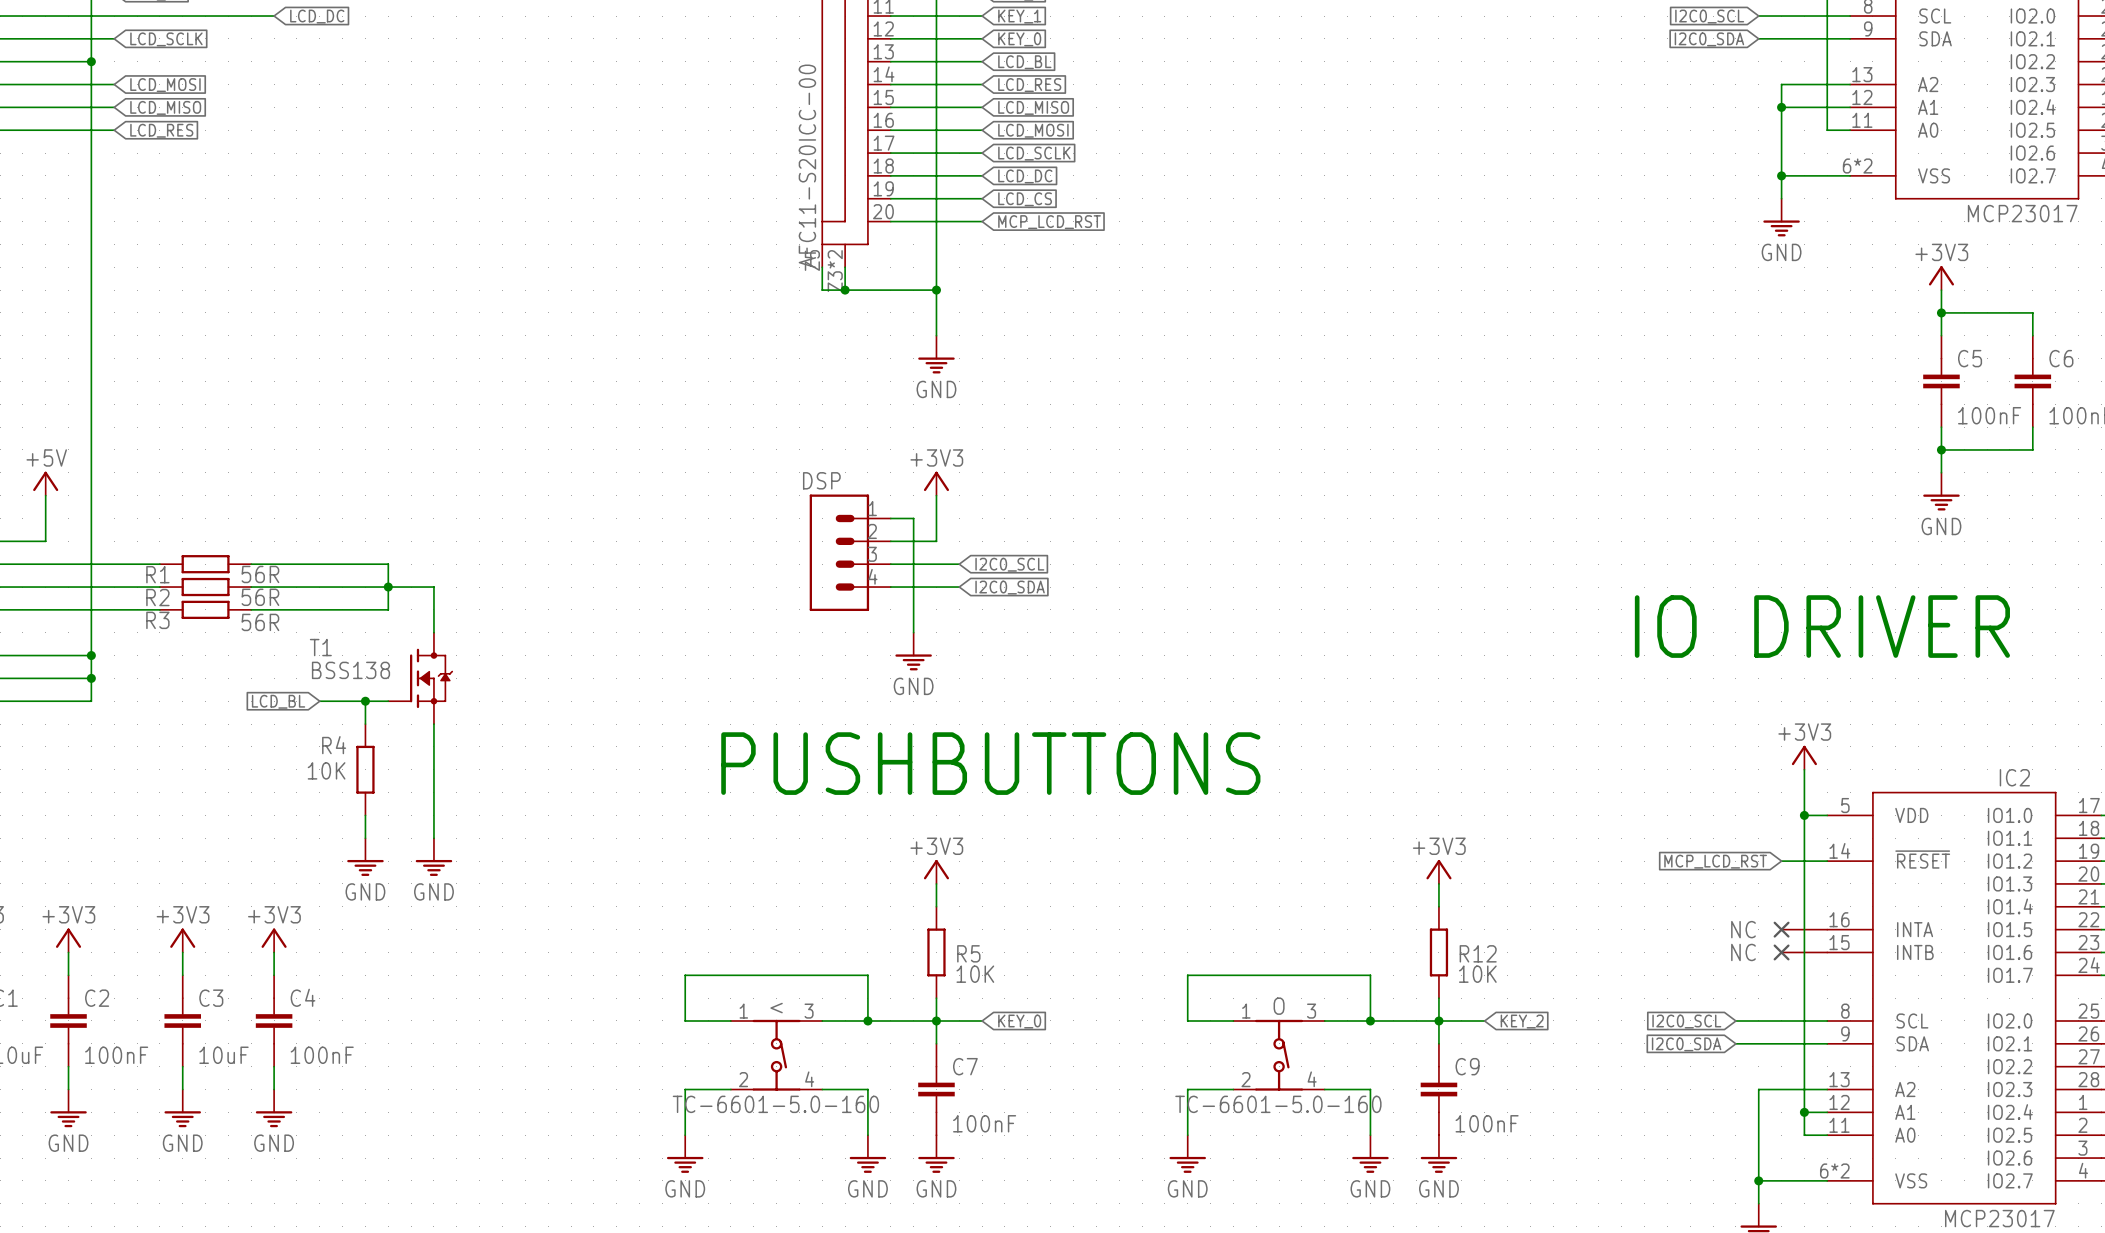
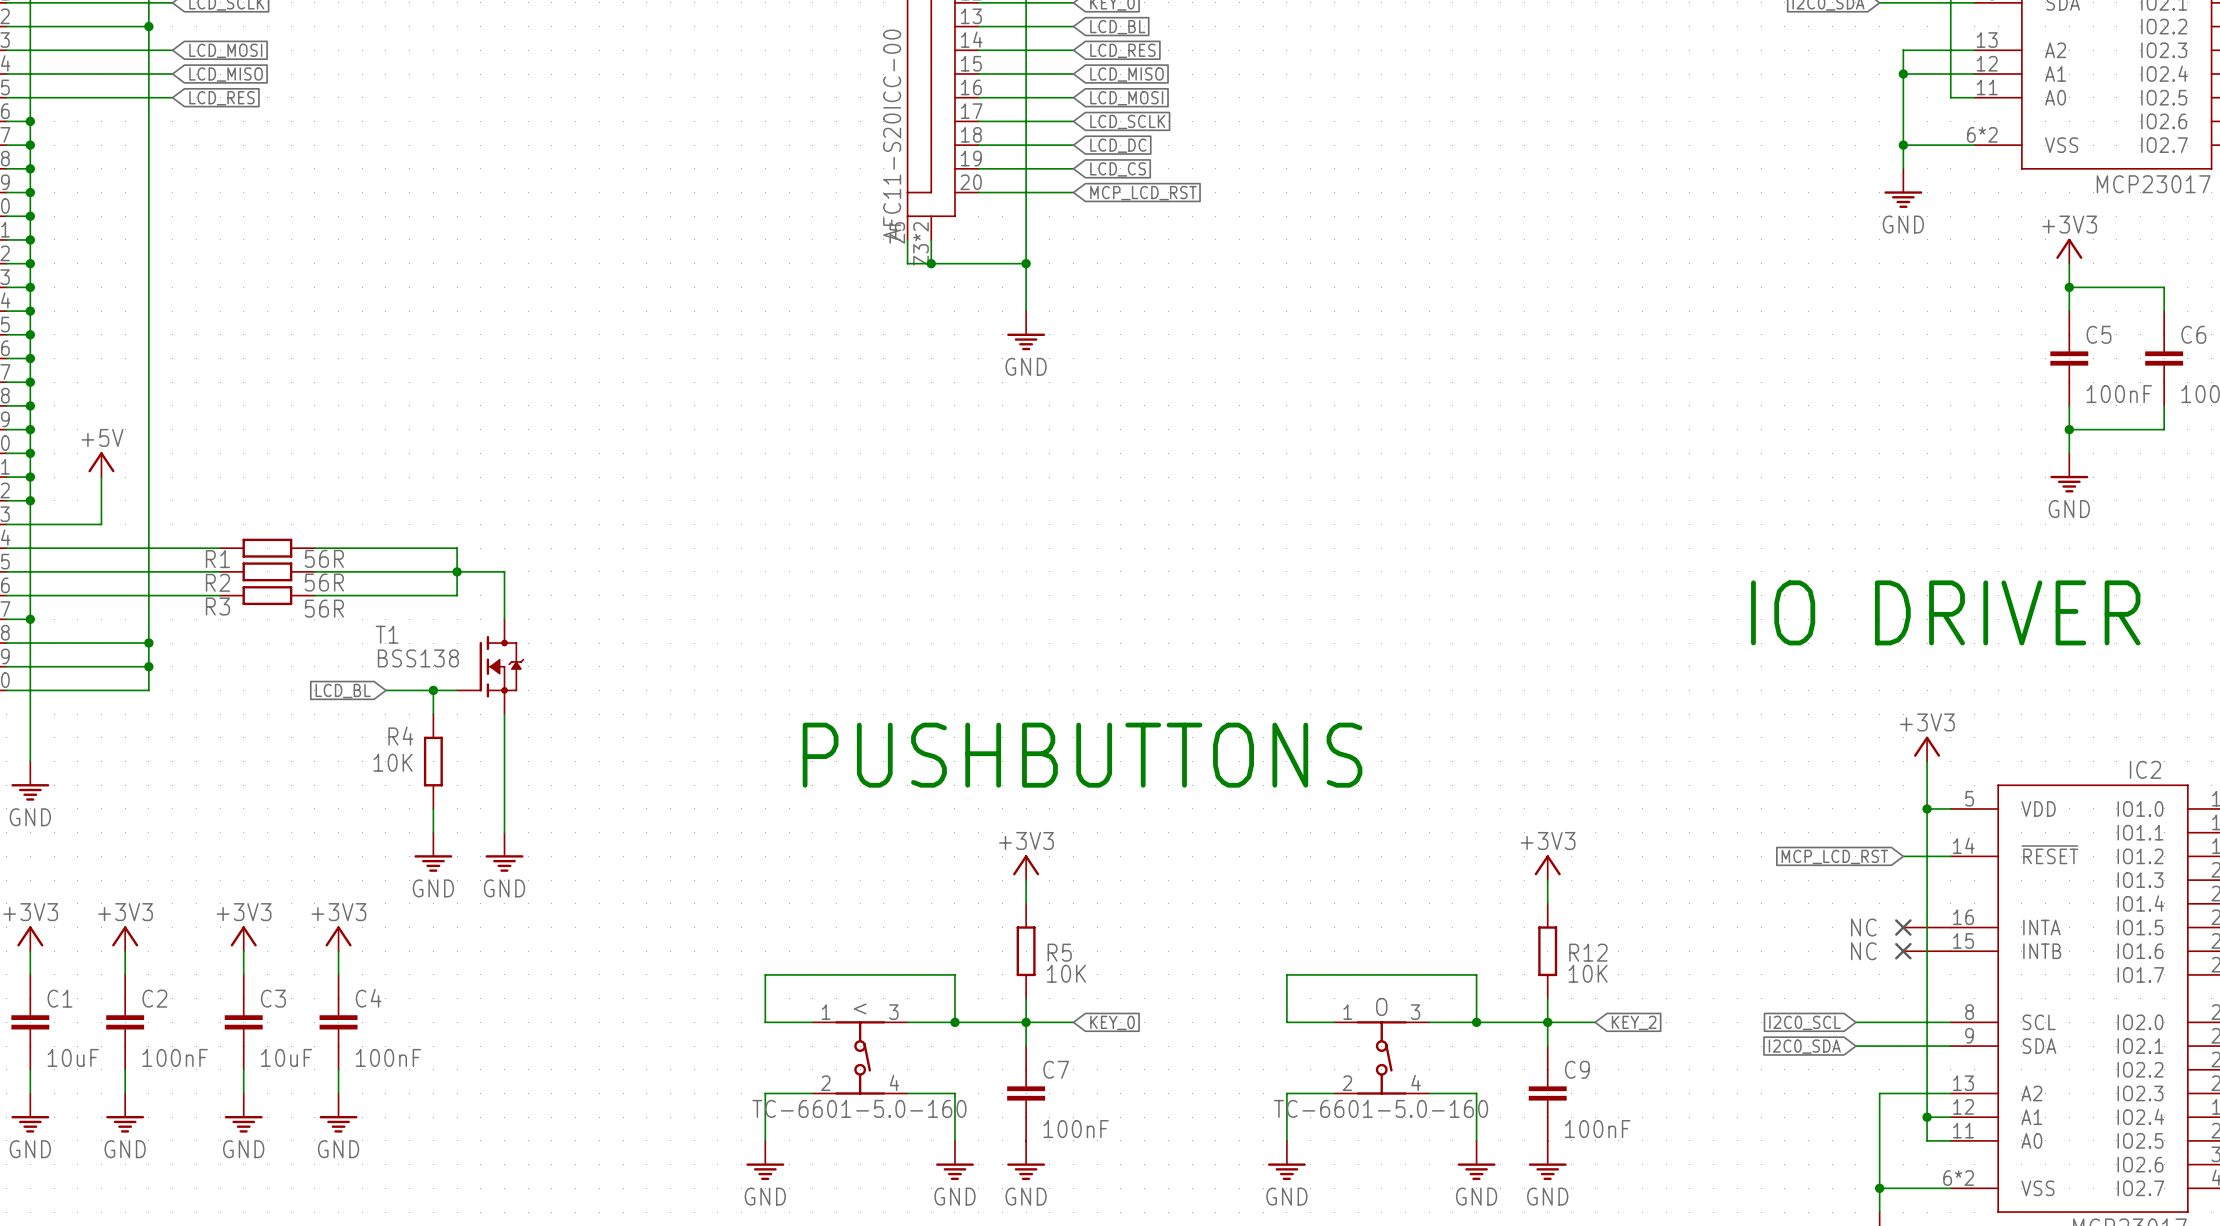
power symbol: +3V3 (936, 483) -> none
wire: (936, 495) (936, 541) (890, 541) -> none
wire: (890, 518) (913, 518) (913, 632) -> none
DSP: (850, 552) -> none
wire: (890, 564) (959, 564) -> none
global label: I2C0_SCL (1009, 564) -> none
wire: (890, 587) (959, 587) -> none
global label: I2C0_SDA (1010, 587) -> none
power symbol: GND (913, 651) -> none

